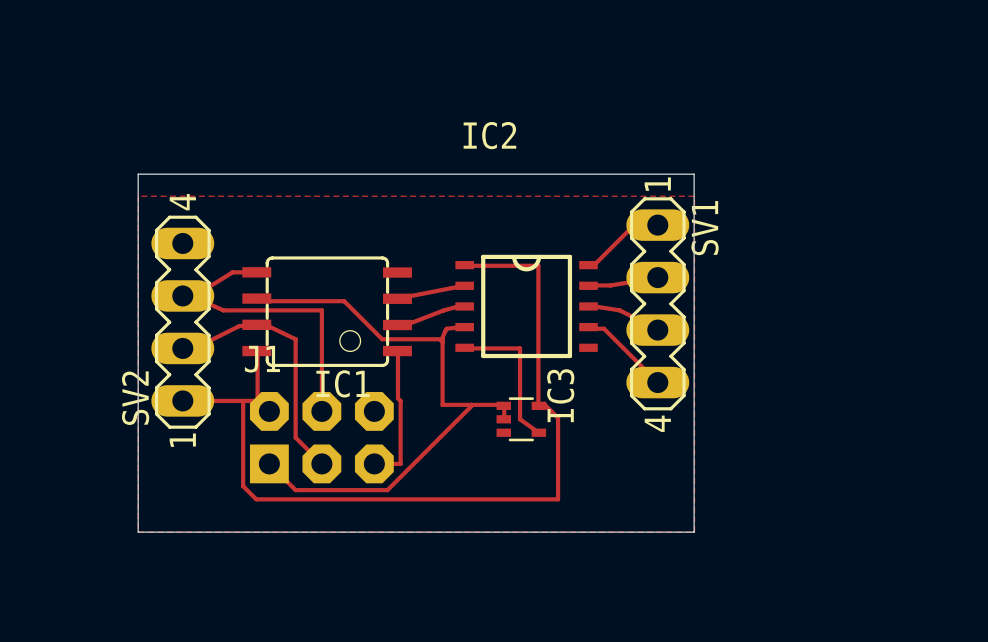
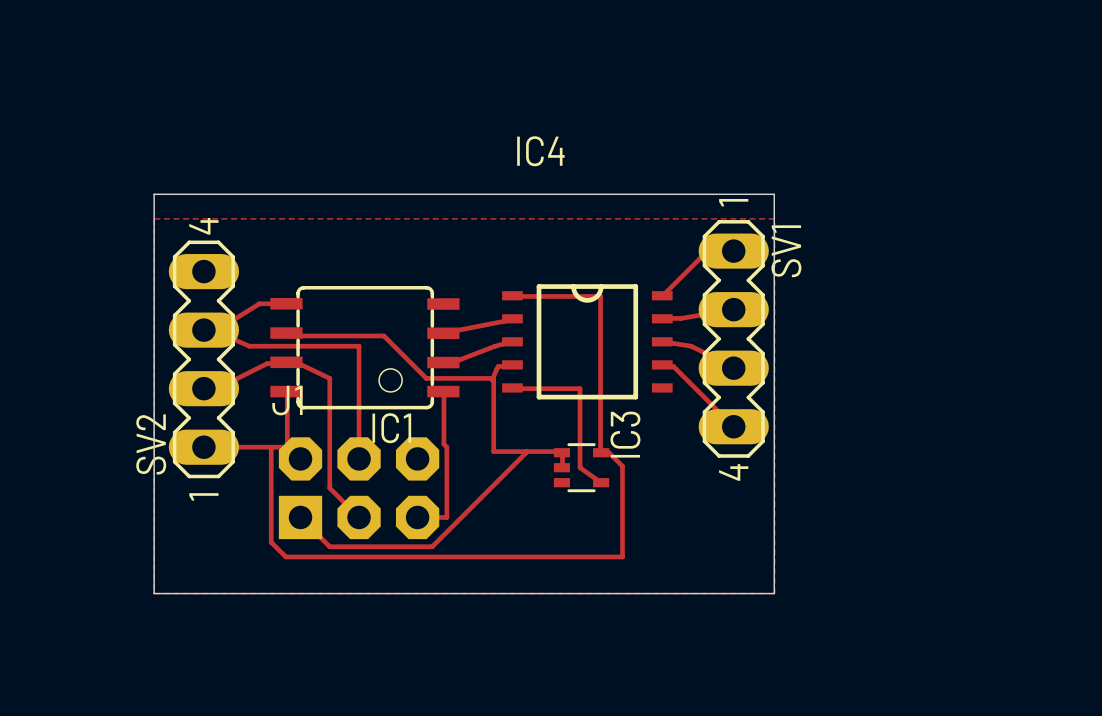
IC2: (526, 306) -> none
IC4: none -> (587, 341)

